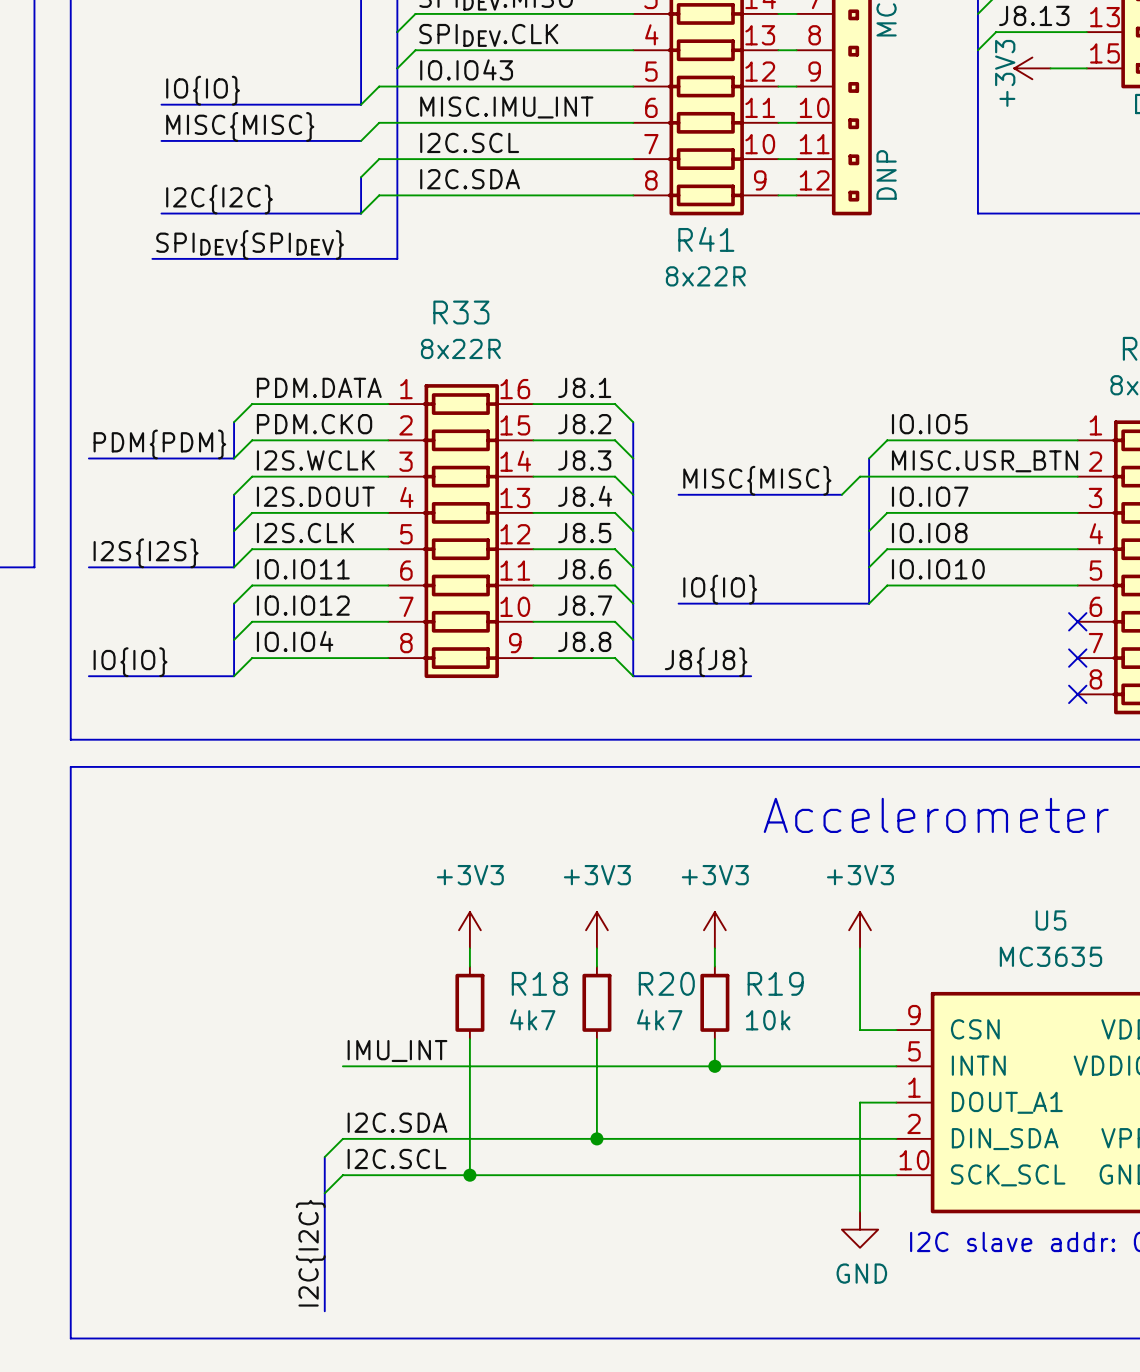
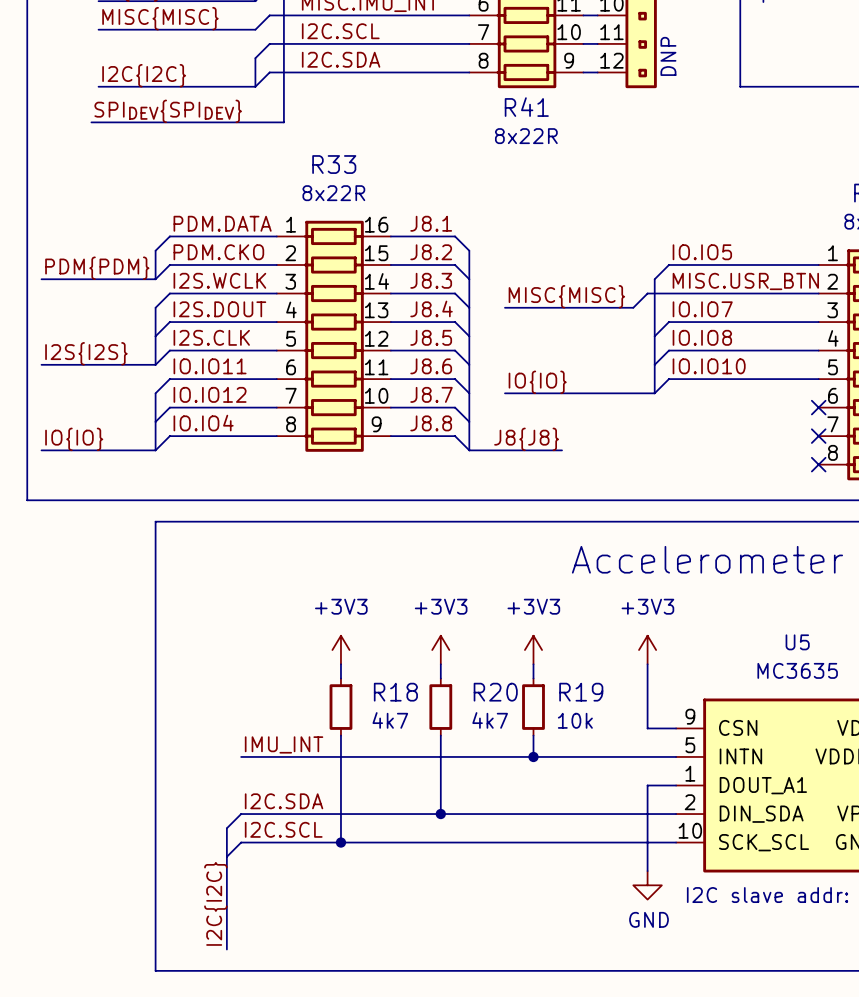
line: (234, 766) (70, 766) (70, 1338) (234, 1338) -> (155, 521) (155, 970)

